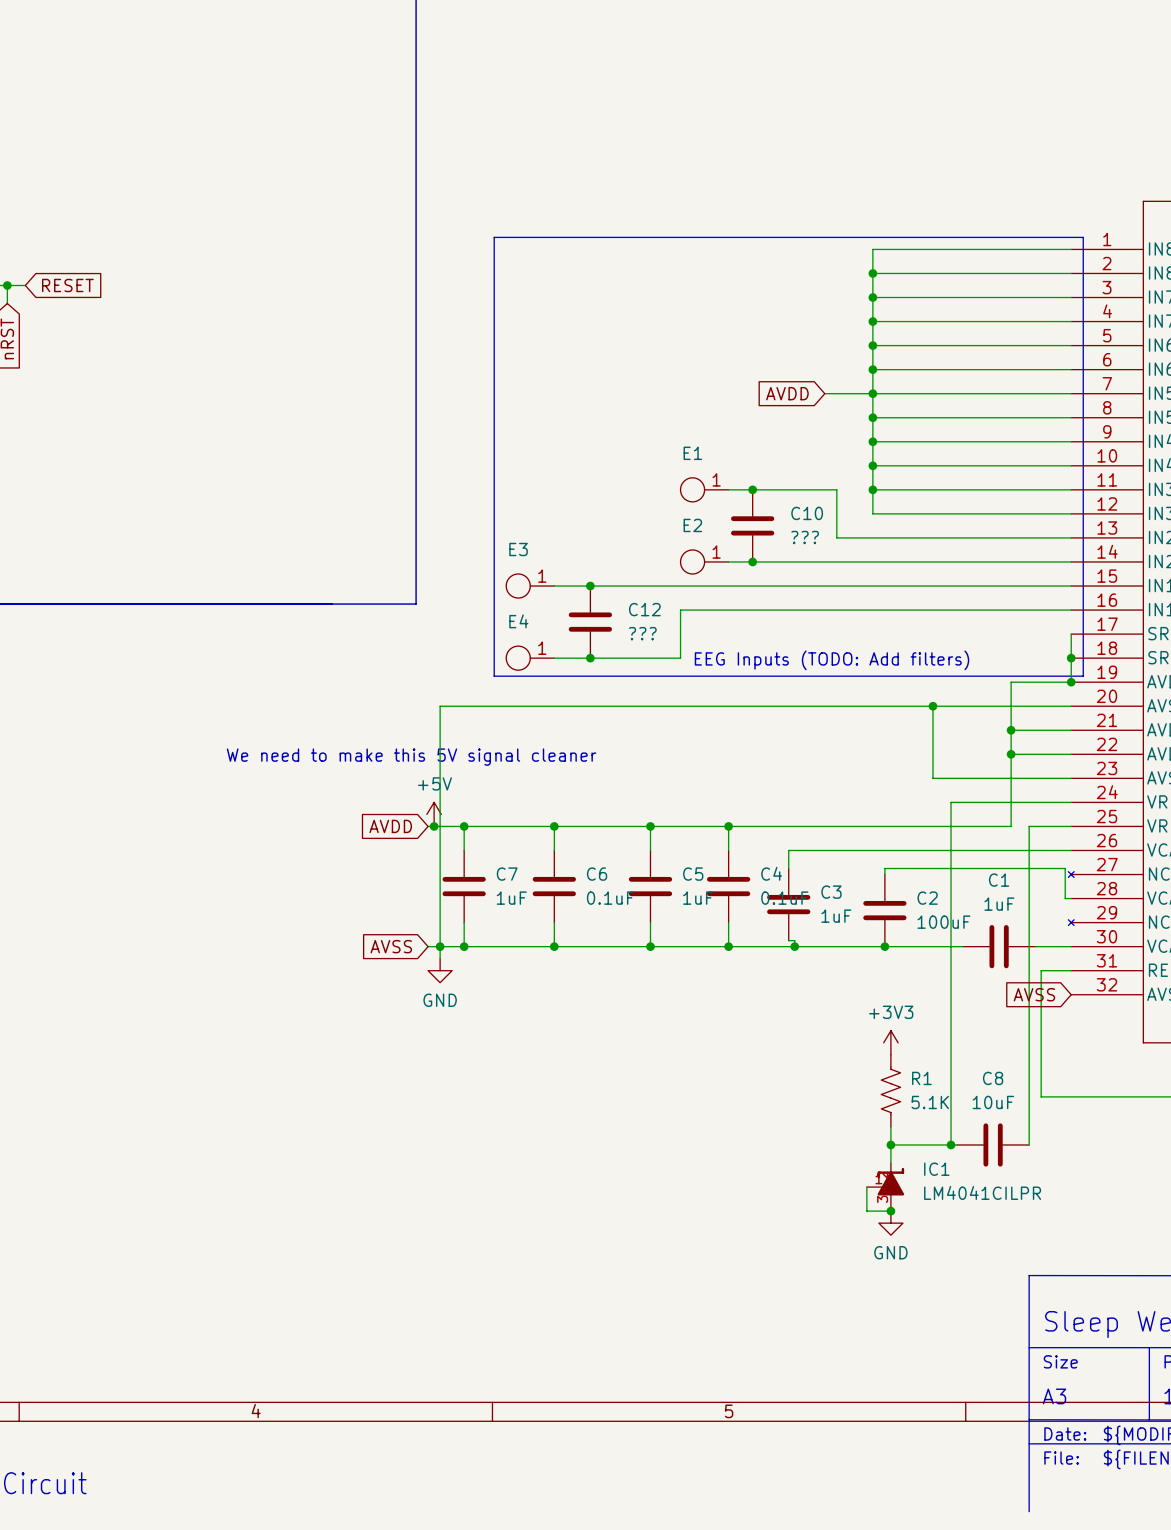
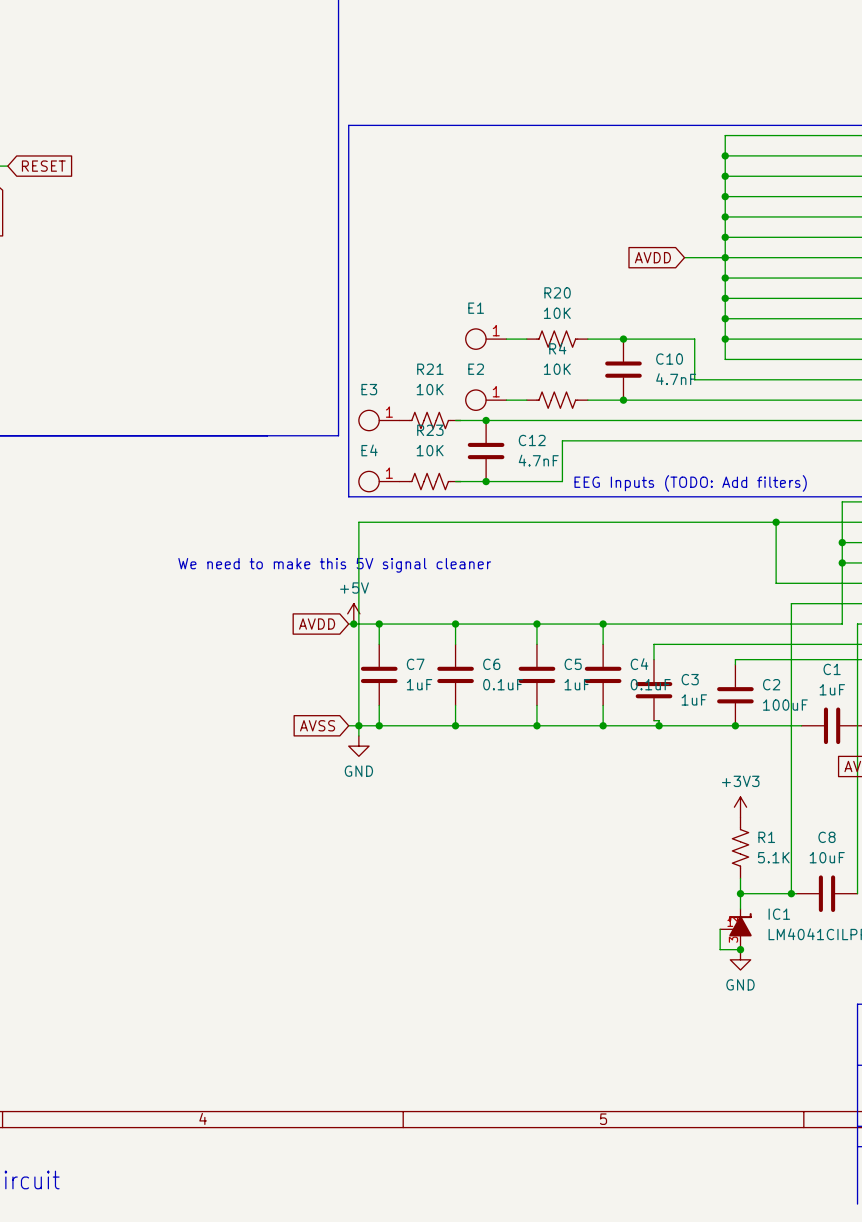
line: (494, 237) (494, 676) -> (404, 125) (348, 125) (348, 496) (404, 496)
wire: none -> (506, 339) (526, 339)
R20: none -> 10K (557, 339)
E1 position: (704, 489) -> (486, 339)
C10 value: ??? (805, 537) -> 4.7nF (676, 379)
wire: none -> (506, 400) (526, 400)
R4: none -> 10K (557, 400)
E2 position: (704, 561) -> (486, 400)
R21: none -> 10K (430, 420)
E3 position: (530, 586) -> (379, 420)
C12 value: ??? (642, 633) -> 4.7nF (538, 460)
R23: none -> 10K (430, 481)
E4 position: (530, 658) -> (379, 481)

